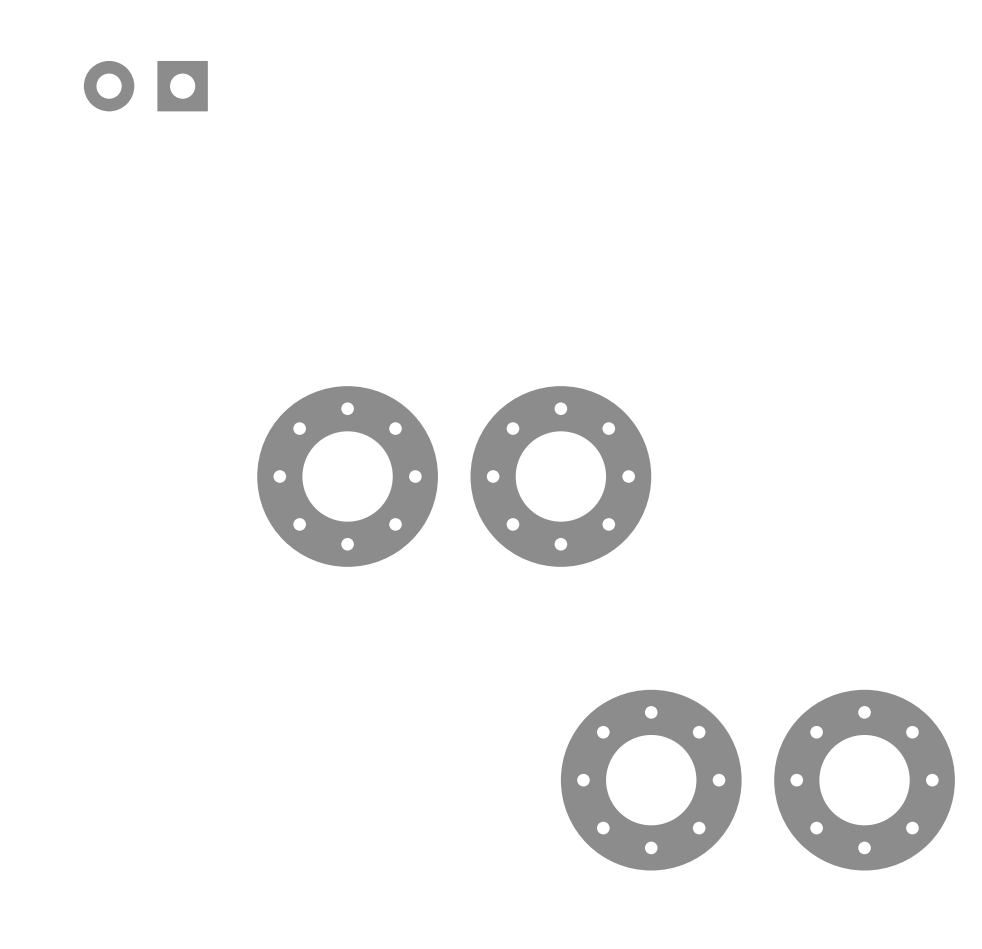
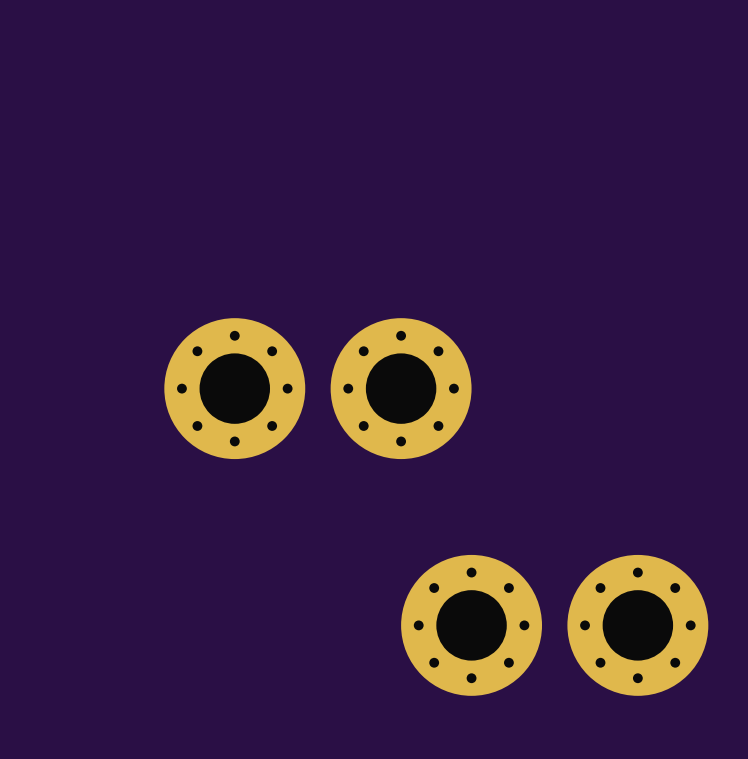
part: (145, 86) -> none

